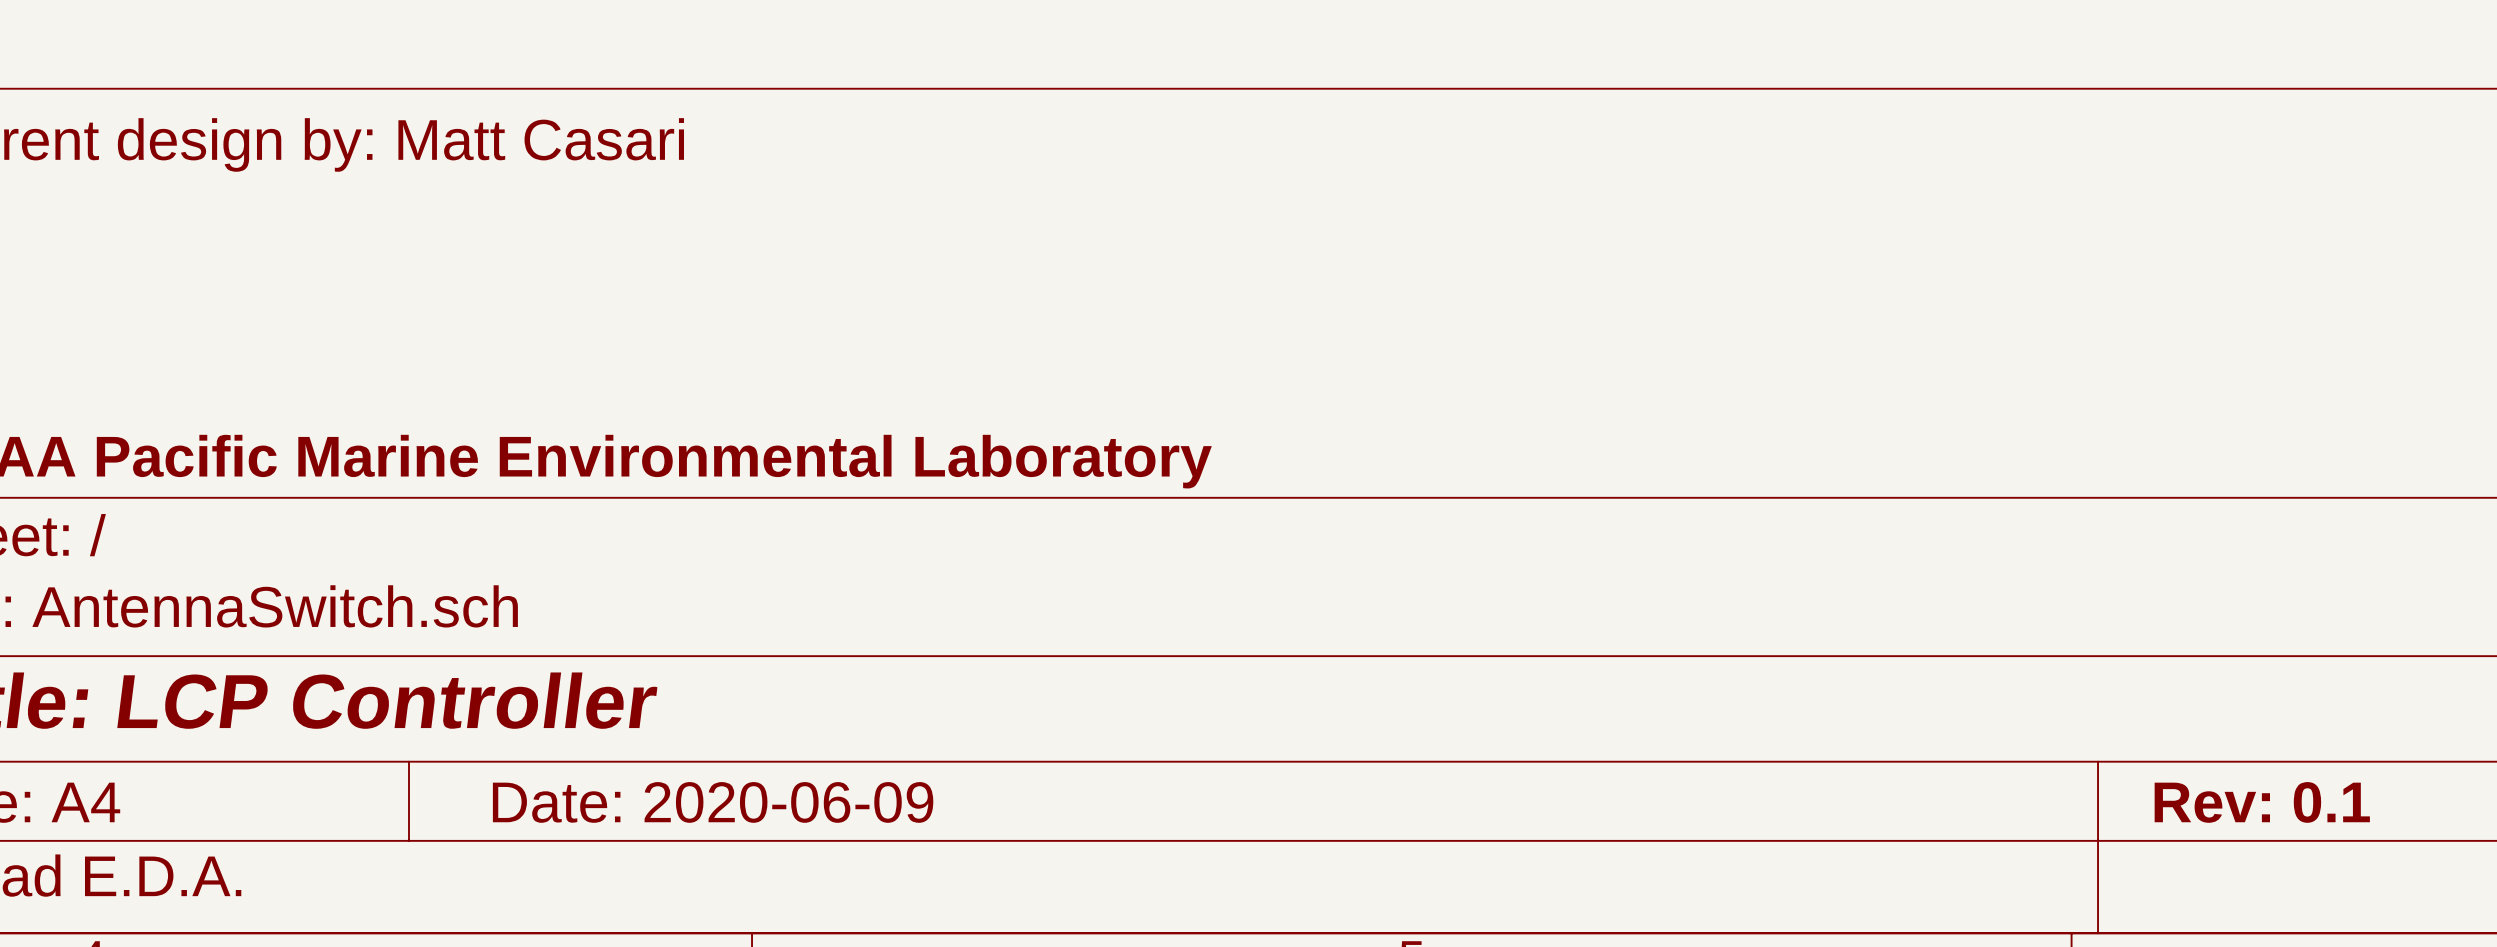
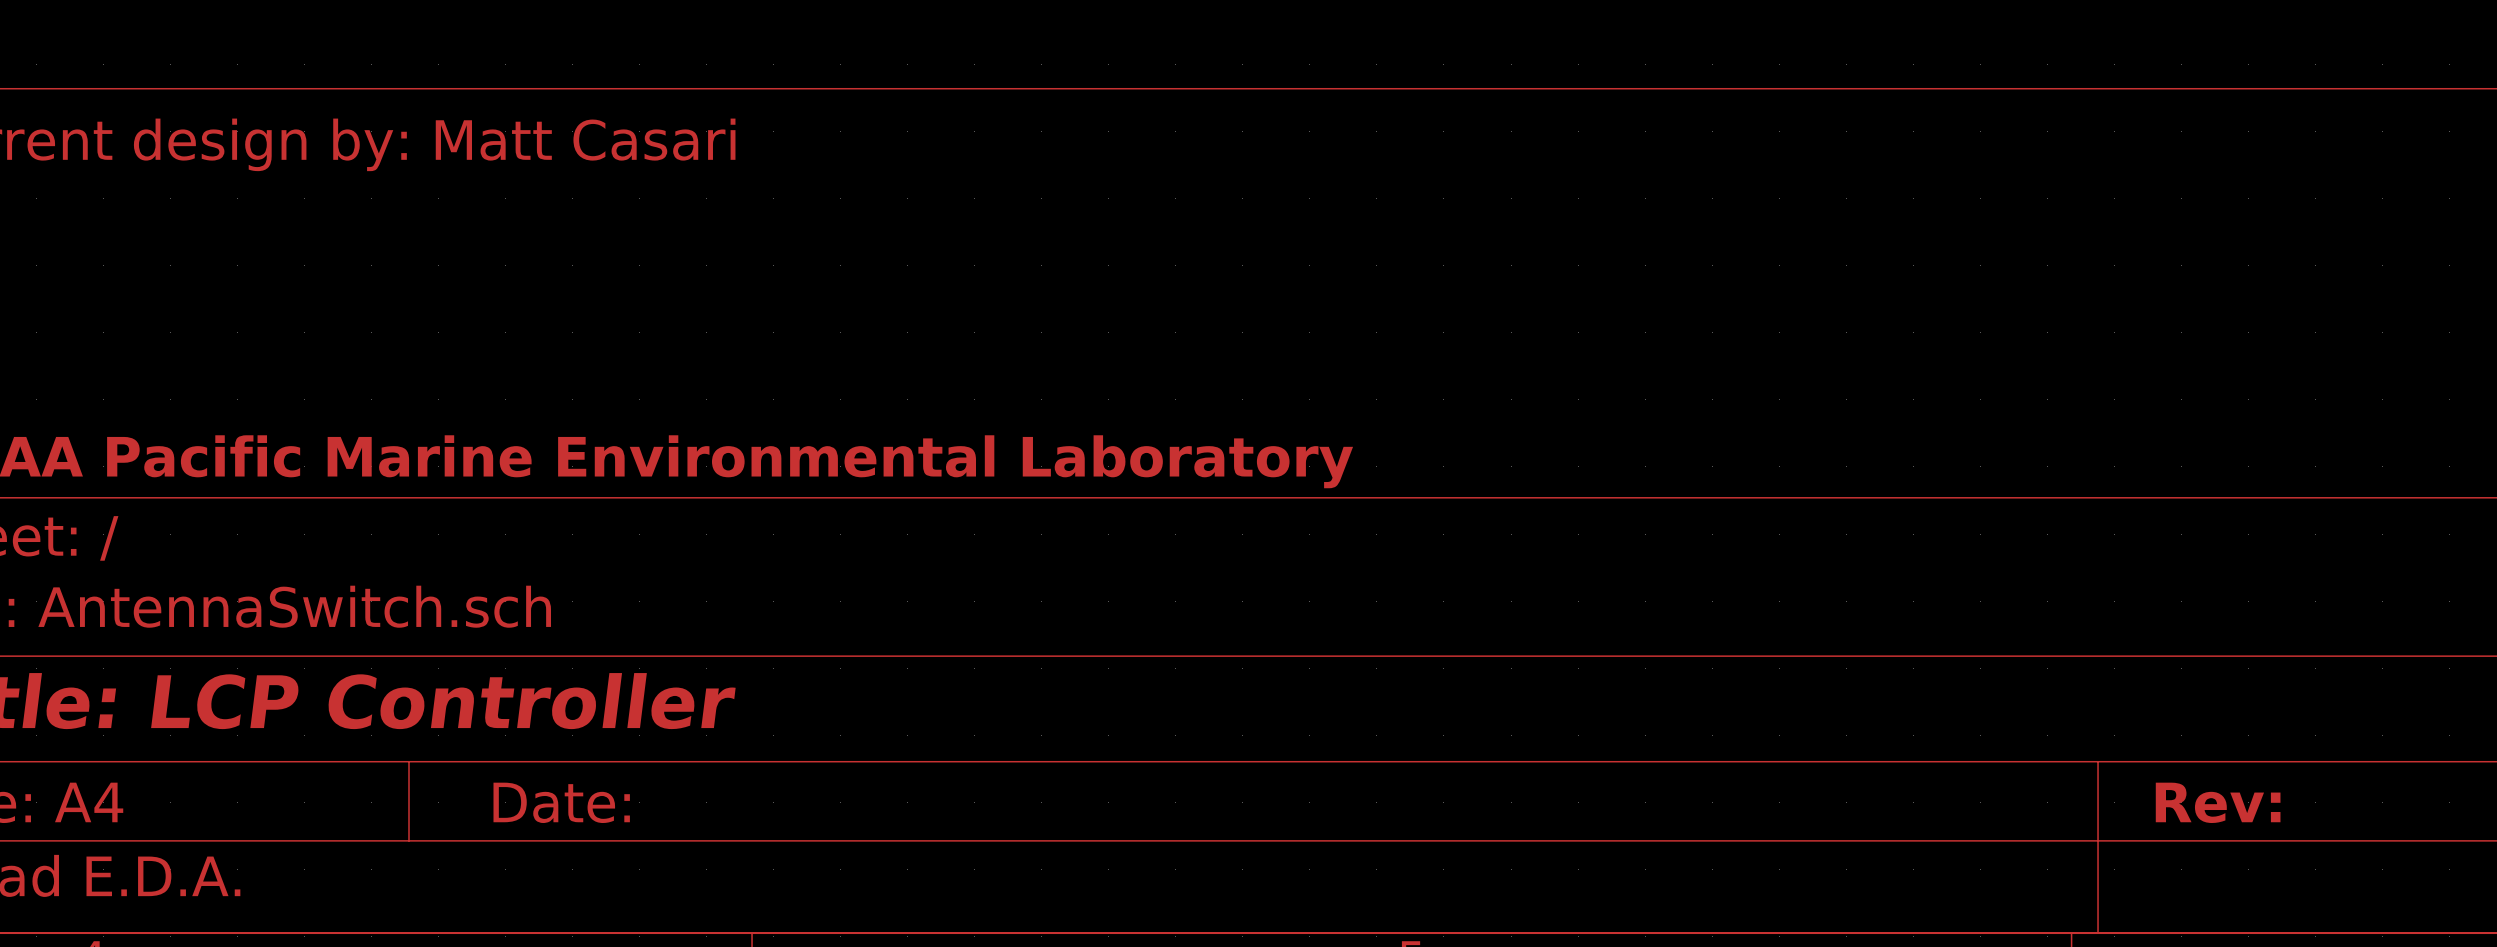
title block: Date: 2020-06-09 (713, 802) -> Date: (561, 802)
title block: Rev: 0.1 (2262, 802) -> Rev: (2218, 802)

